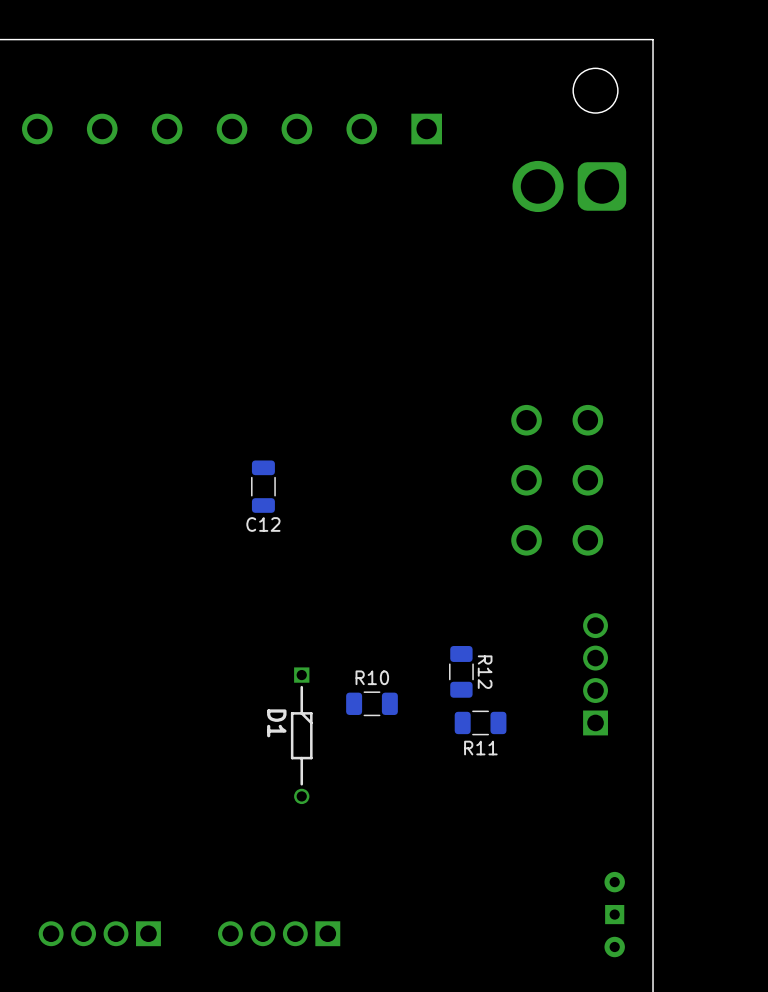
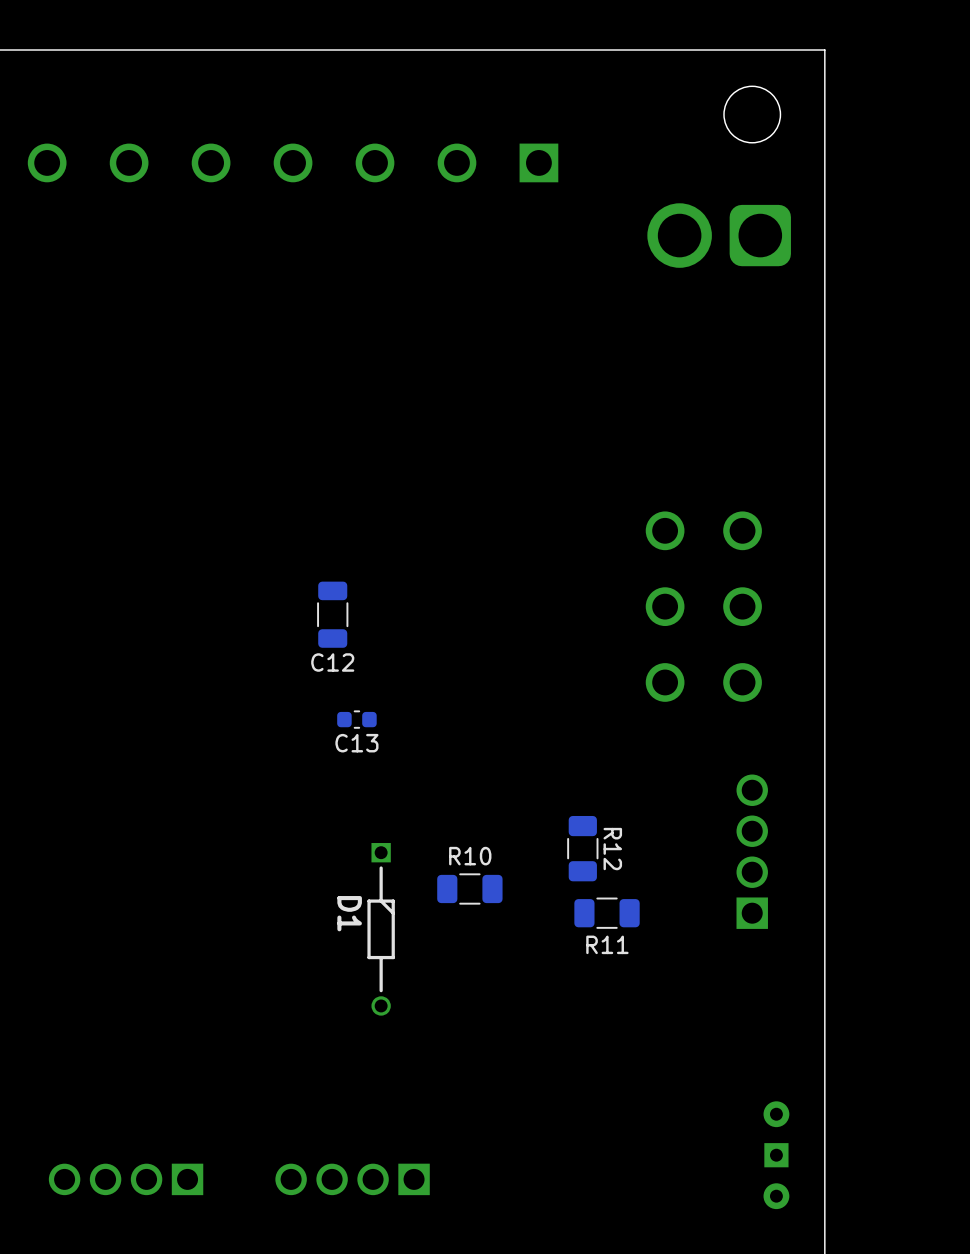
C13: none -> (356, 719)

